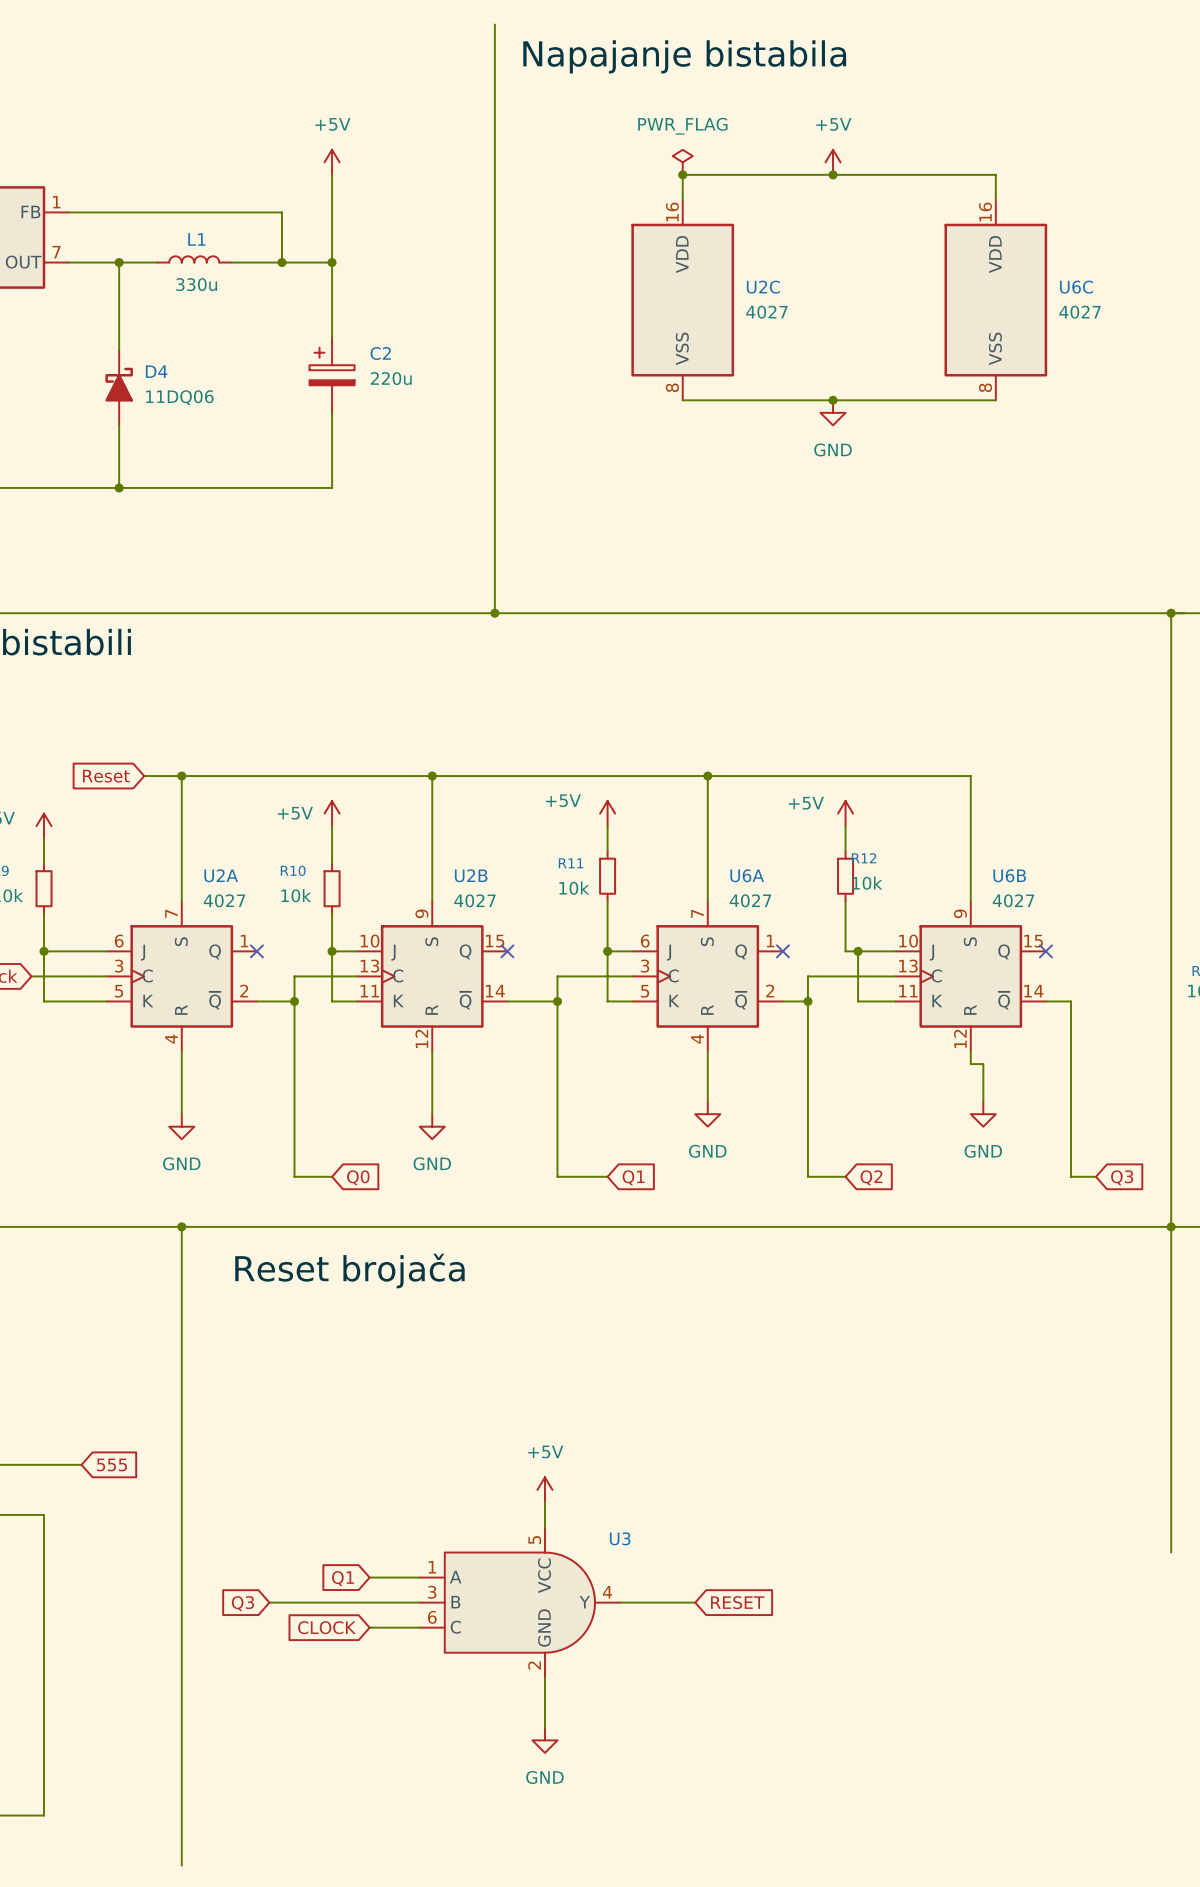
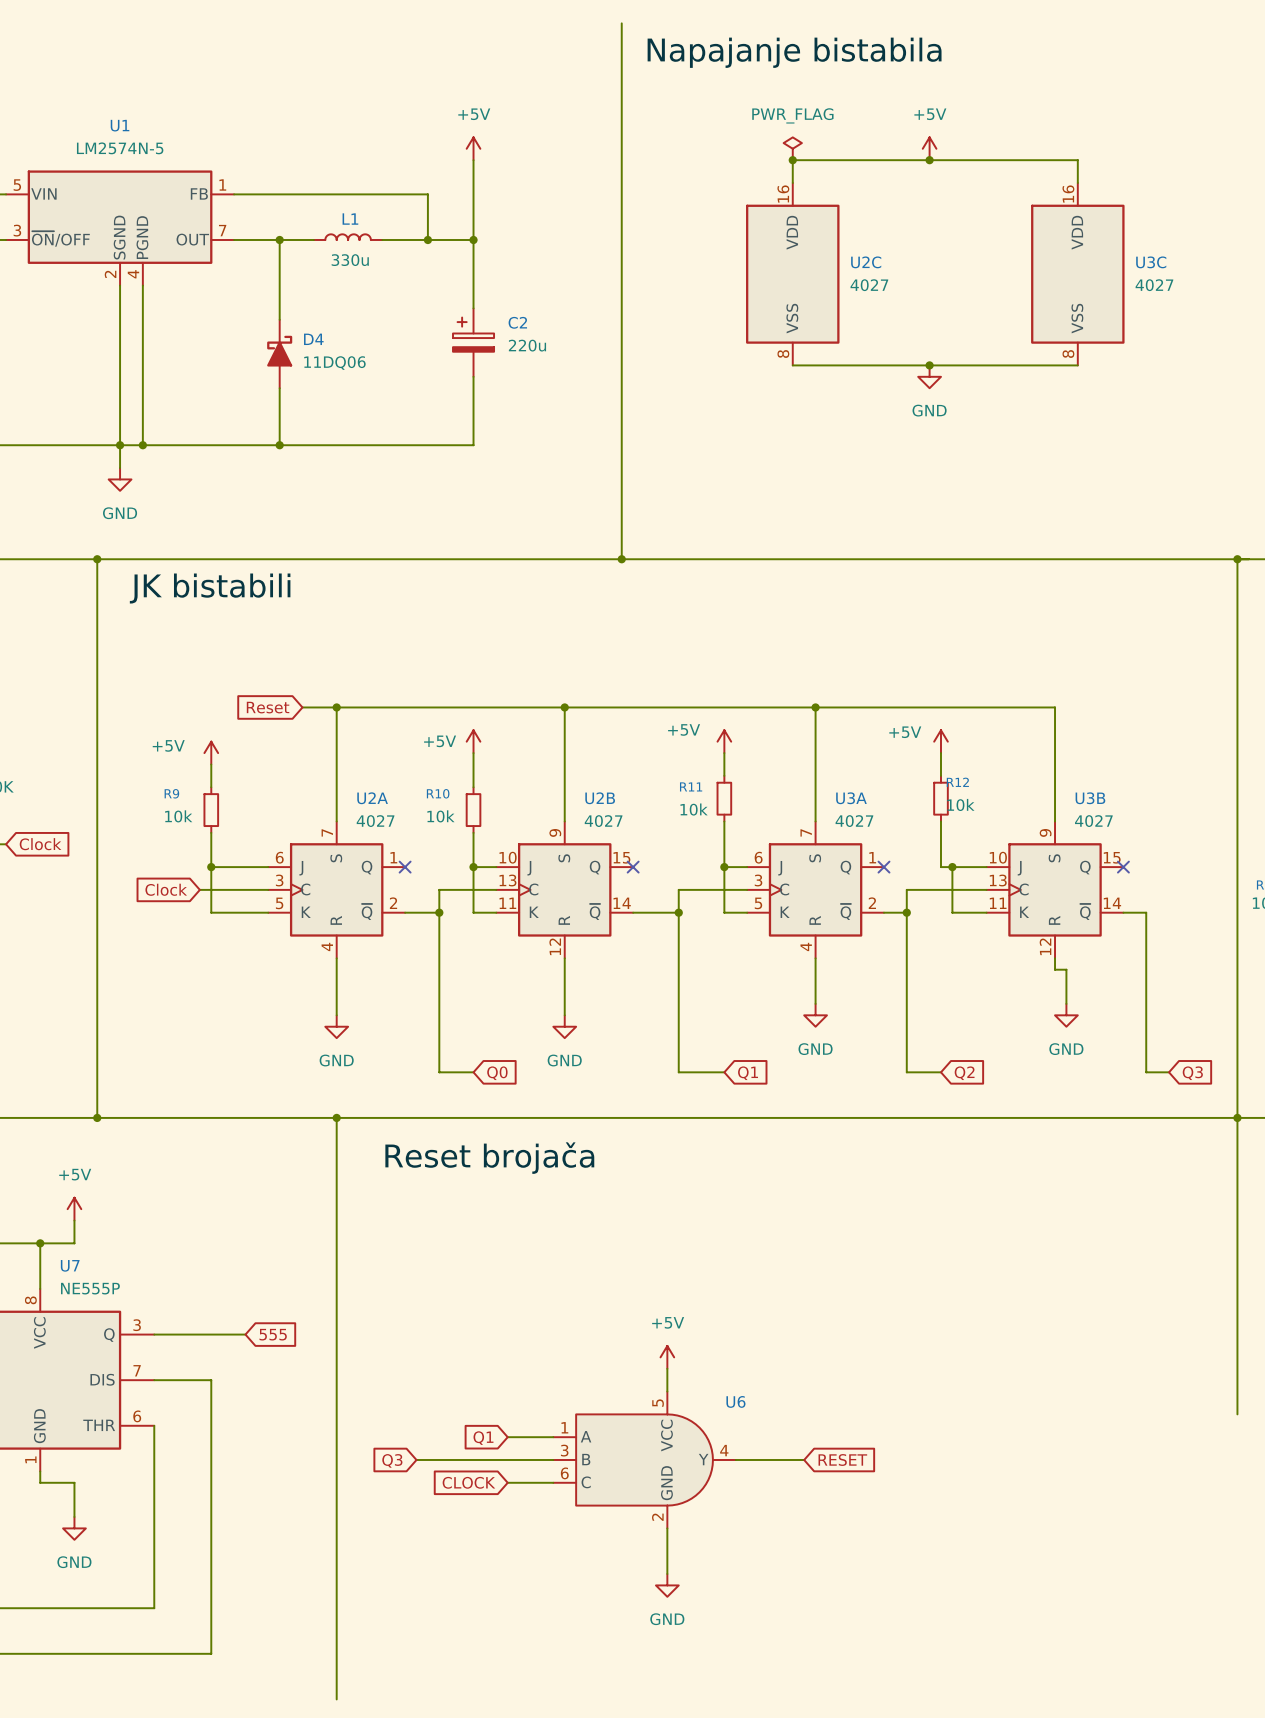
U6C name: U6C (1076, 287) -> U3C (1151, 262)
U6A name: U6A (747, 875) -> U3A (851, 798)
U6B name: U6B (1009, 875) -> U3B (1090, 798)
U3 name: U3 (620, 1538) -> U6 (735, 1401)

